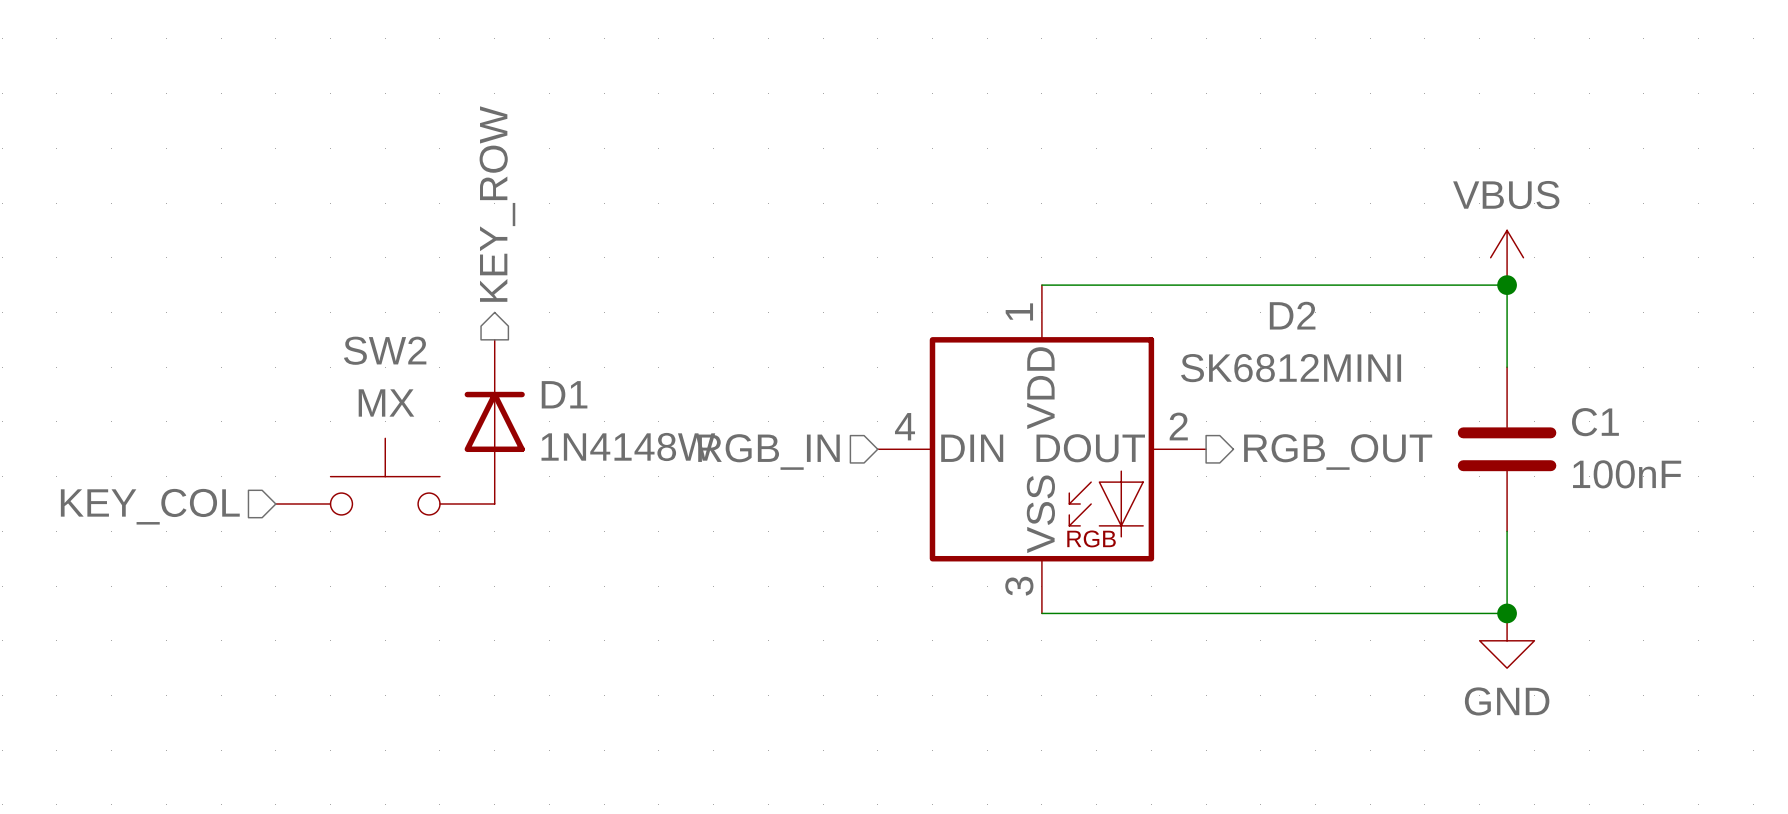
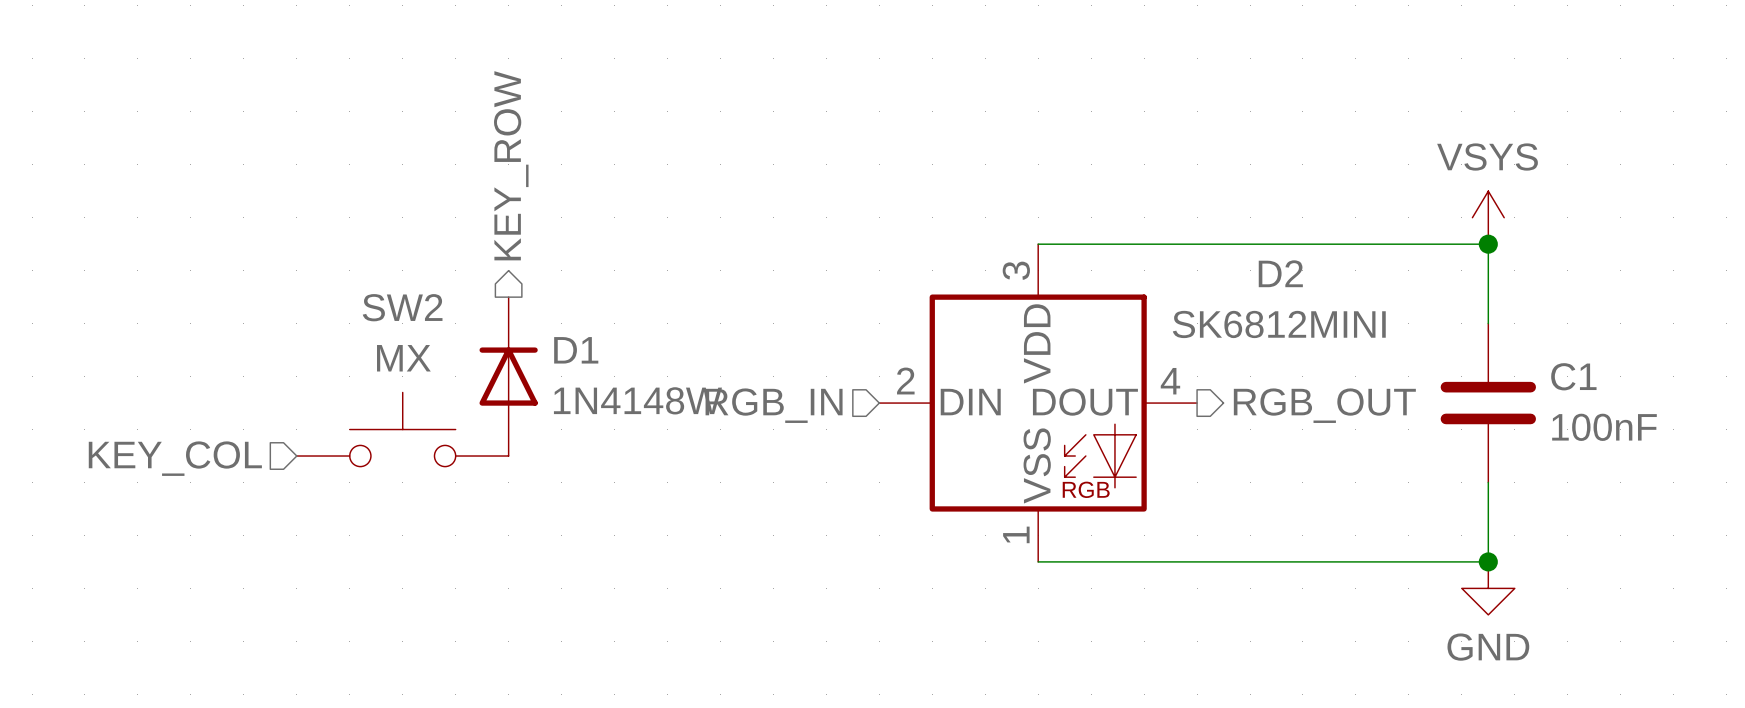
power symbol: VBUS (1507, 257) -> VSYS (1488, 217)
D2 pin number: 1 (1019, 311) -> 3 (1016, 270)
D2 pin number: 4 (905, 426) -> 2 (905, 381)
D2 pin number: 2 (1178, 426) -> 4 (1170, 381)
D2 pin number: 3 (1019, 586) -> 1 (1016, 534)

